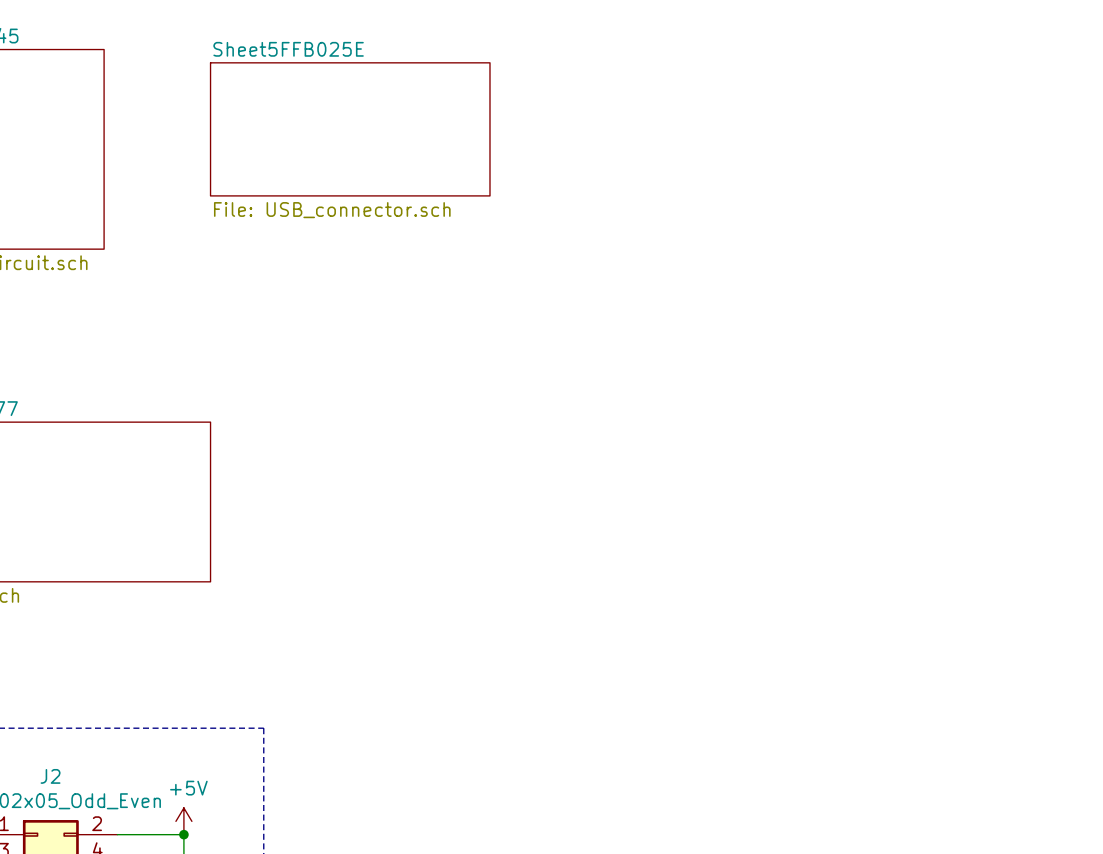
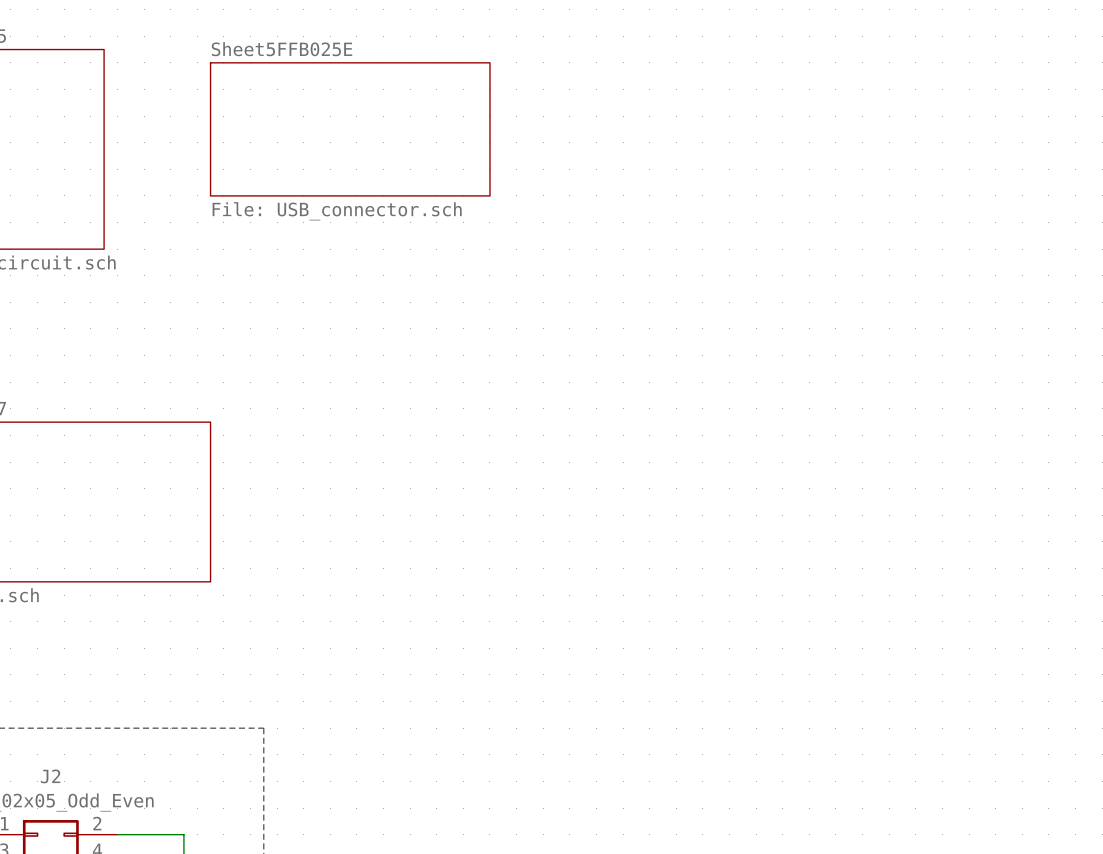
power symbol: +5V (183, 821) -> none
junction: (183, 834) -> none

